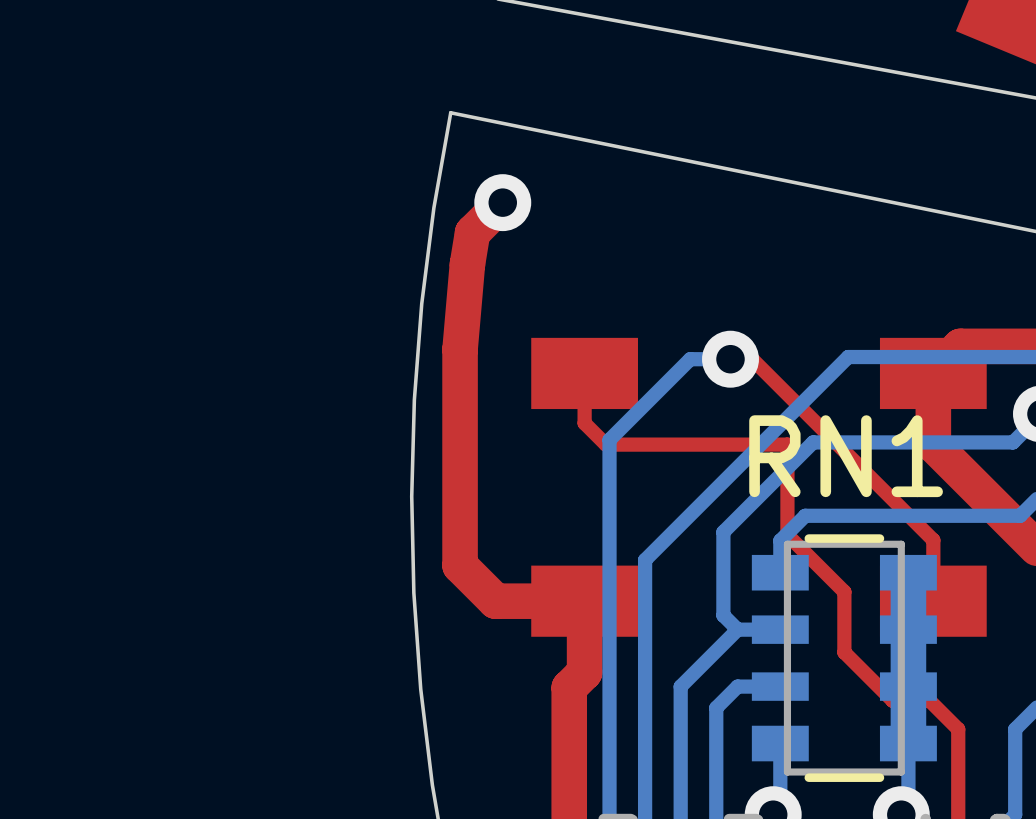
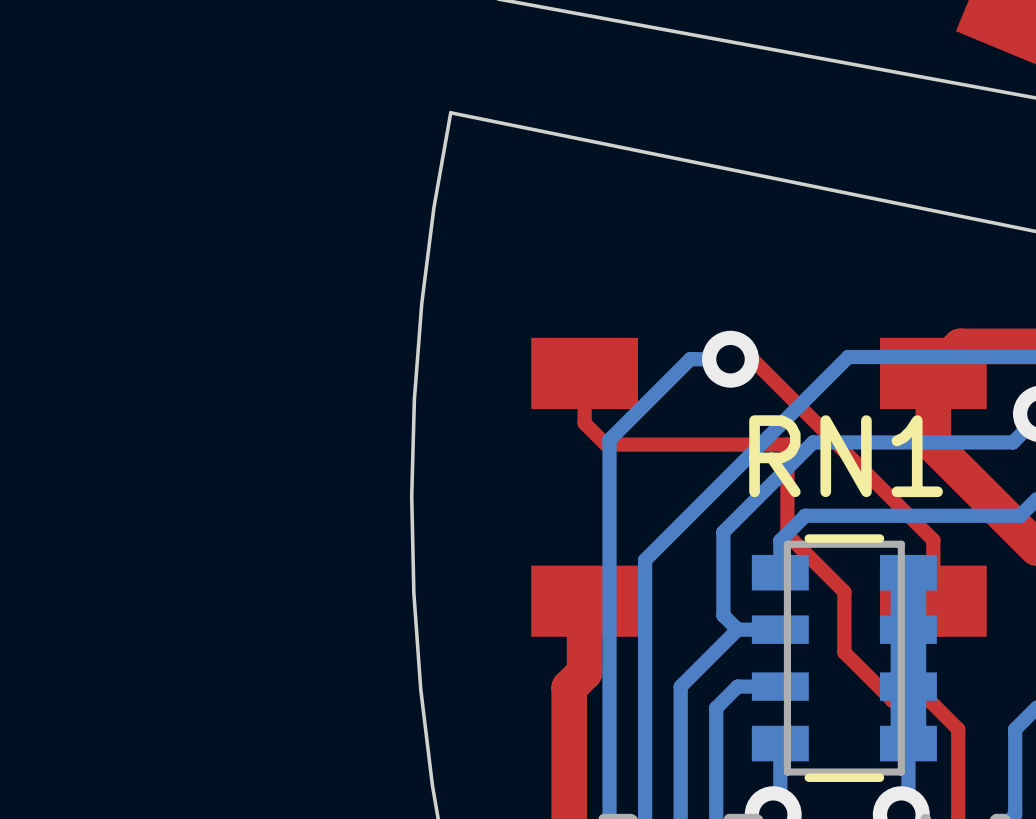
top track: (502, 202) (472, 232) (467, 264) (460, 349) (460, 565) (495, 601) (584, 601) -> none
via: (502, 202) -> none

